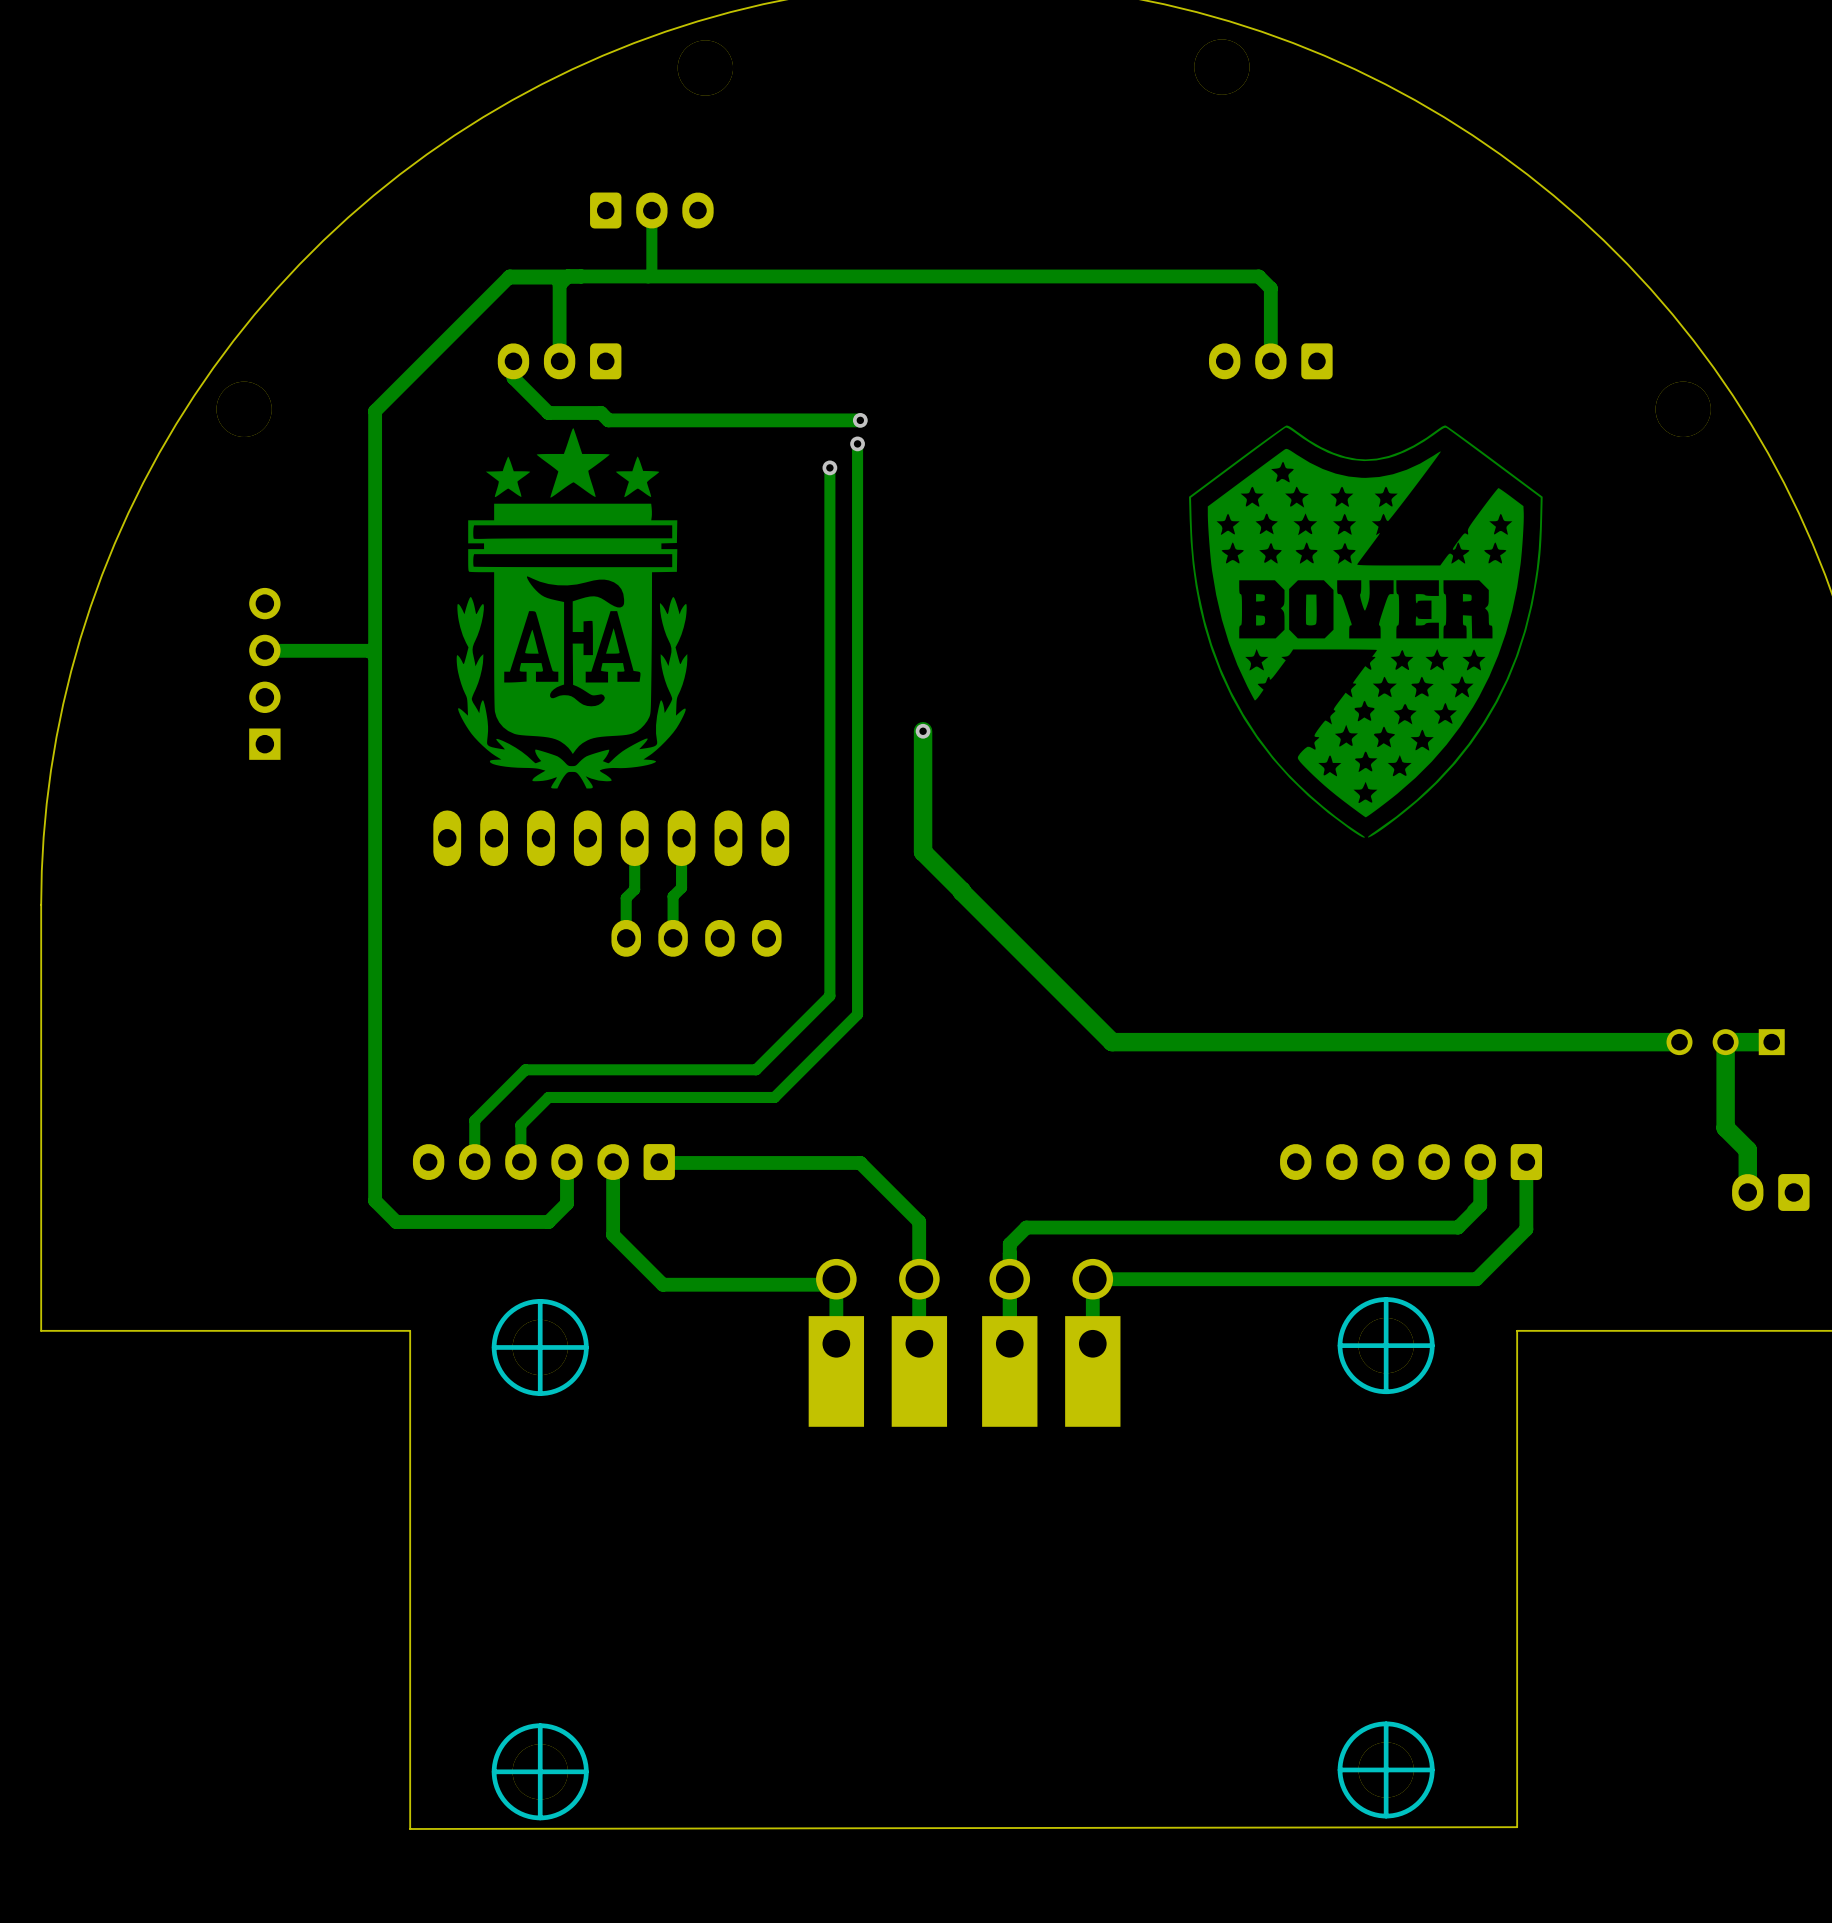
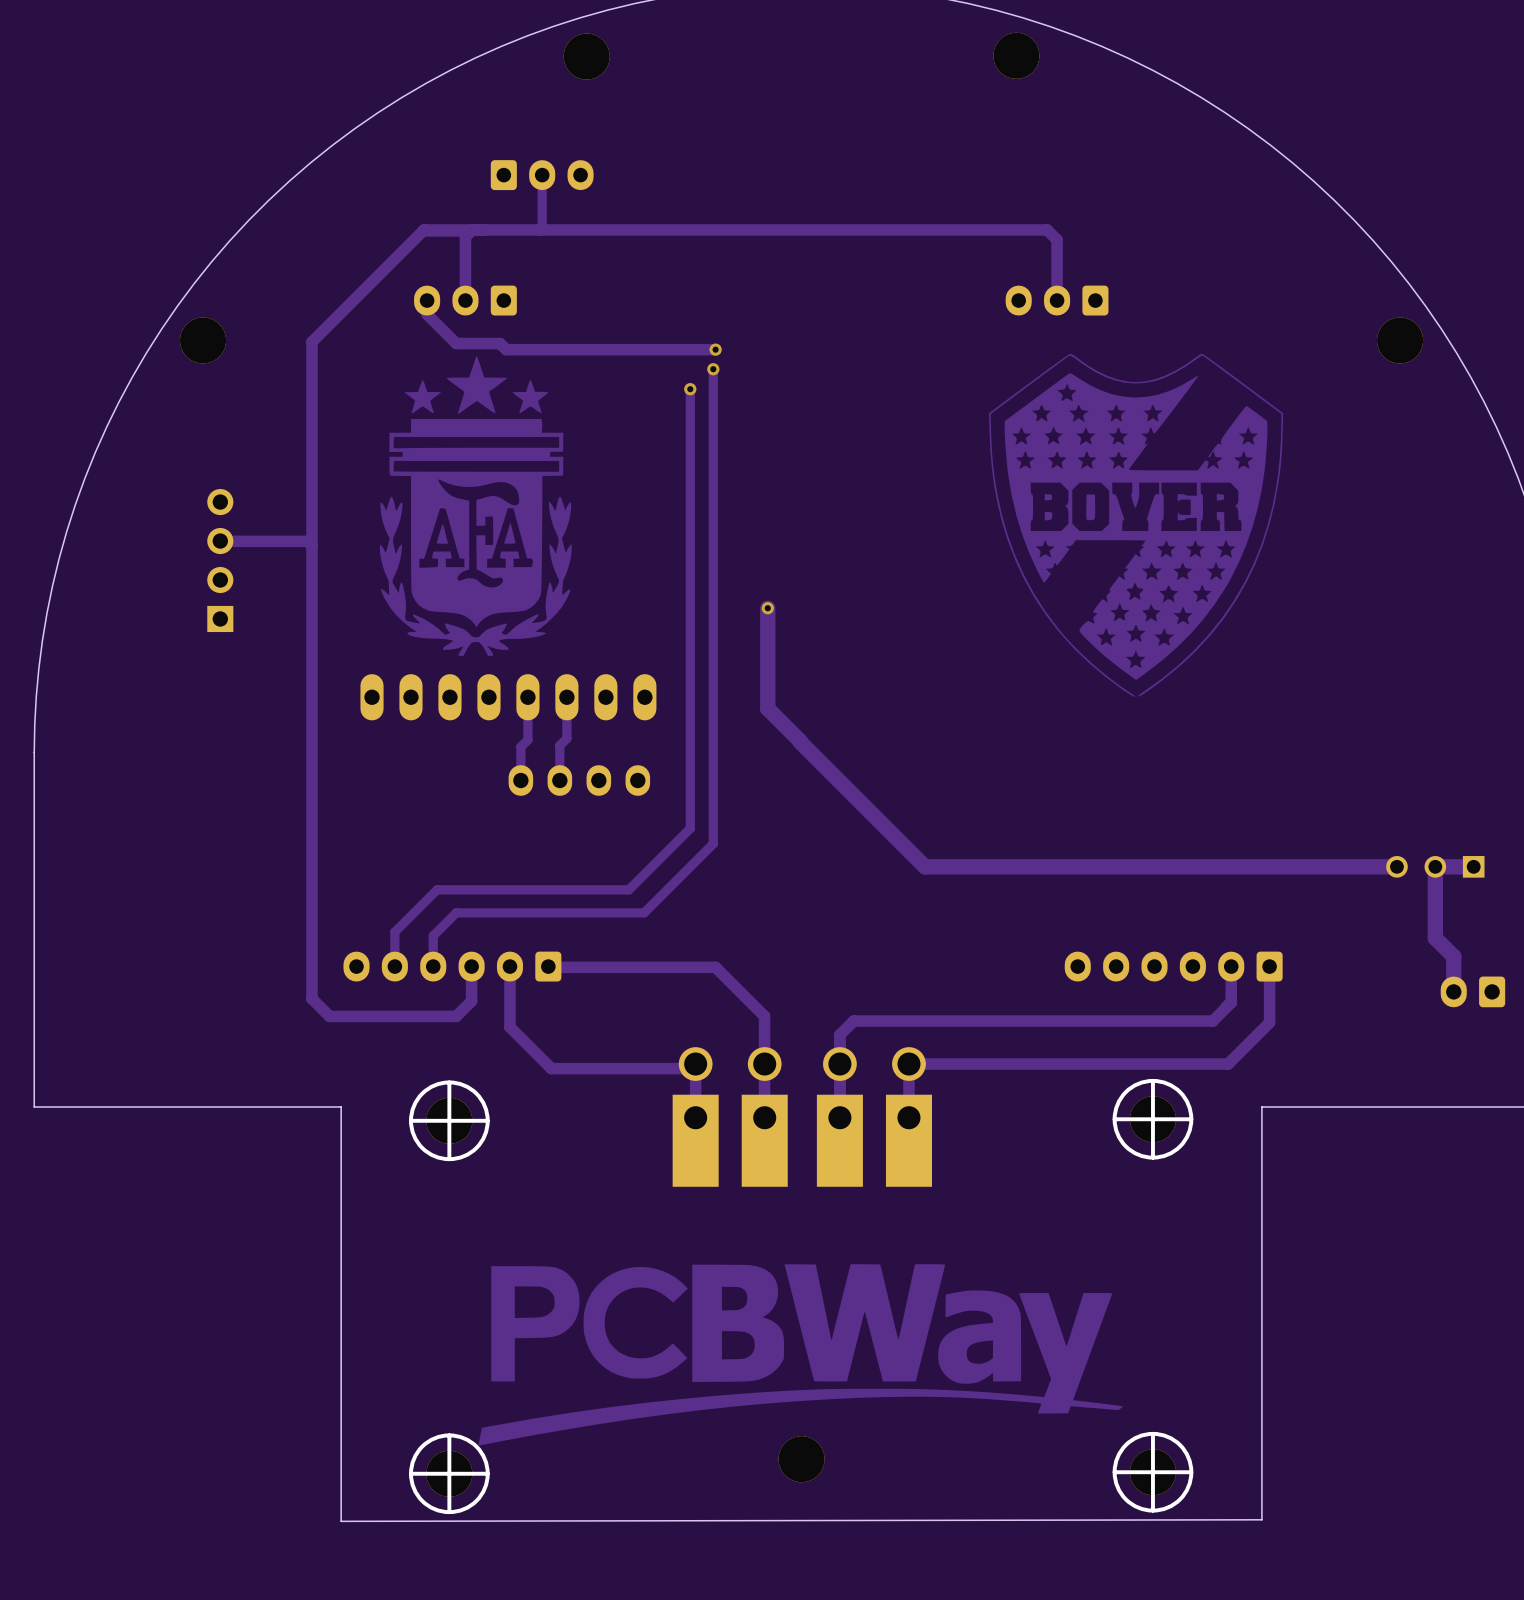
drawing: none -> [478, 1264, 1124, 1446]
part: none -> (801, 1459)

